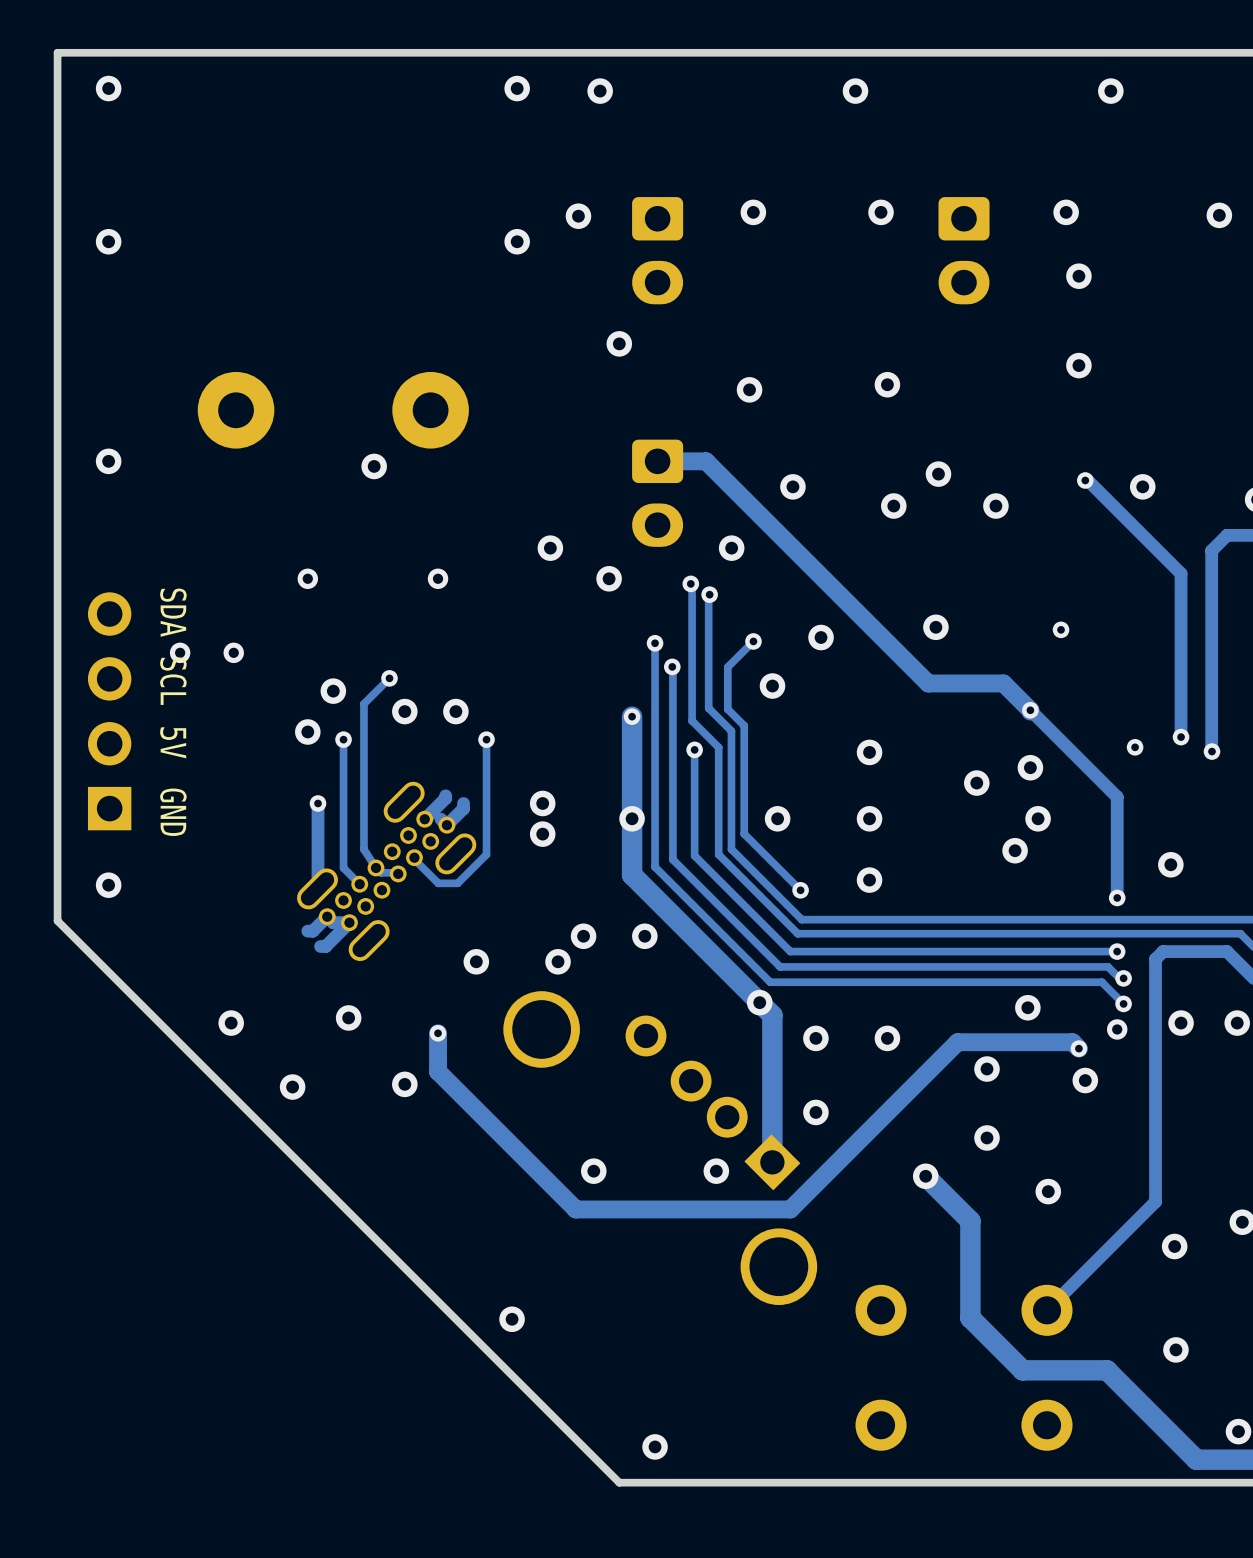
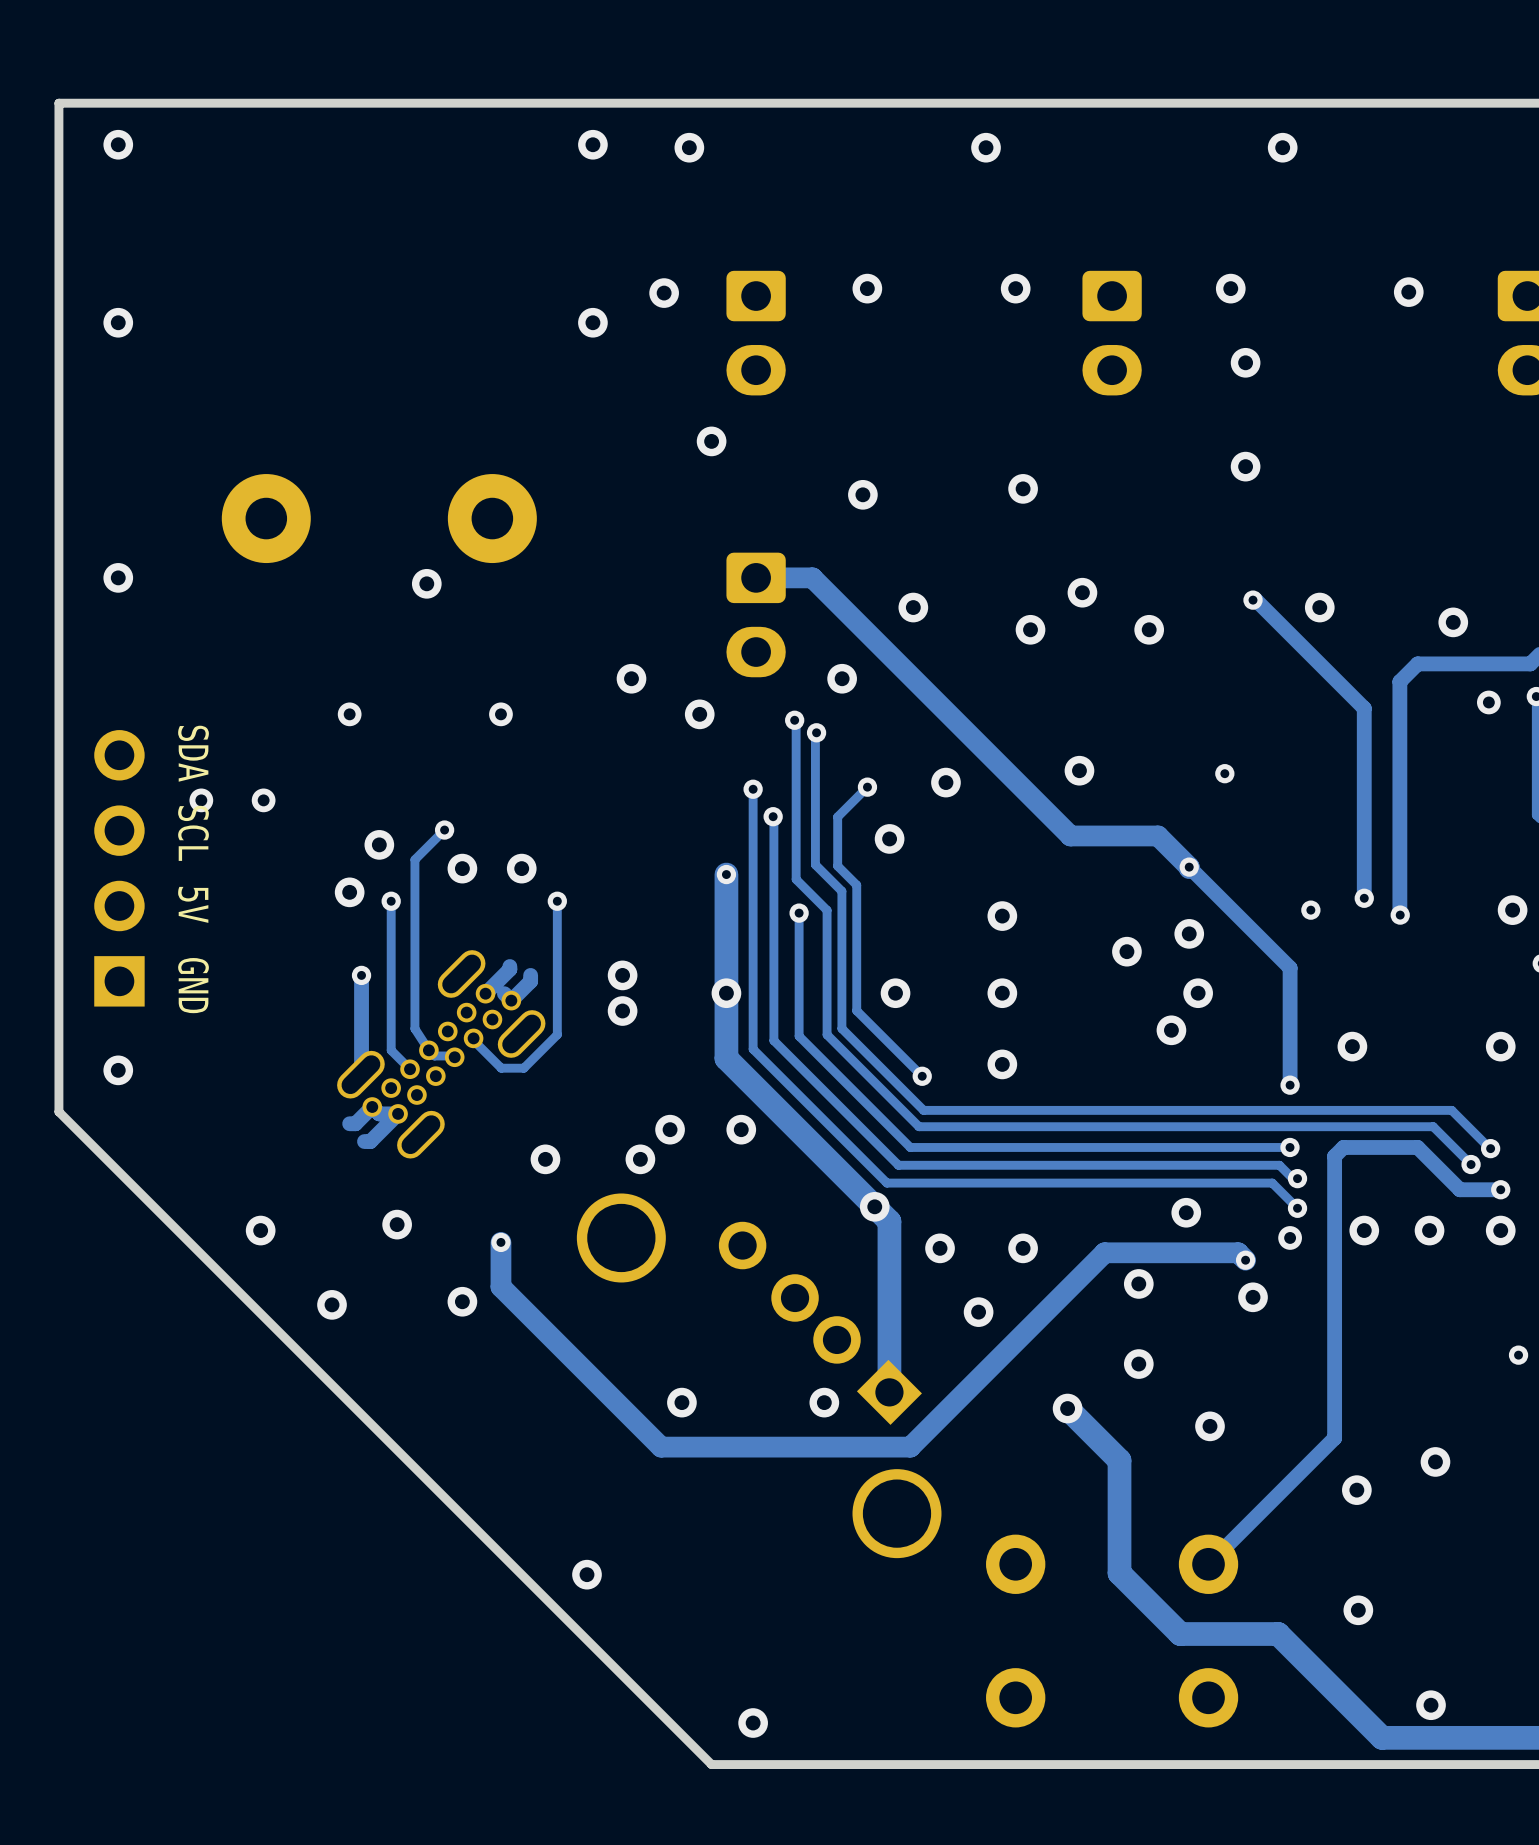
via position: (815, 1112) -> (978, 1312)

